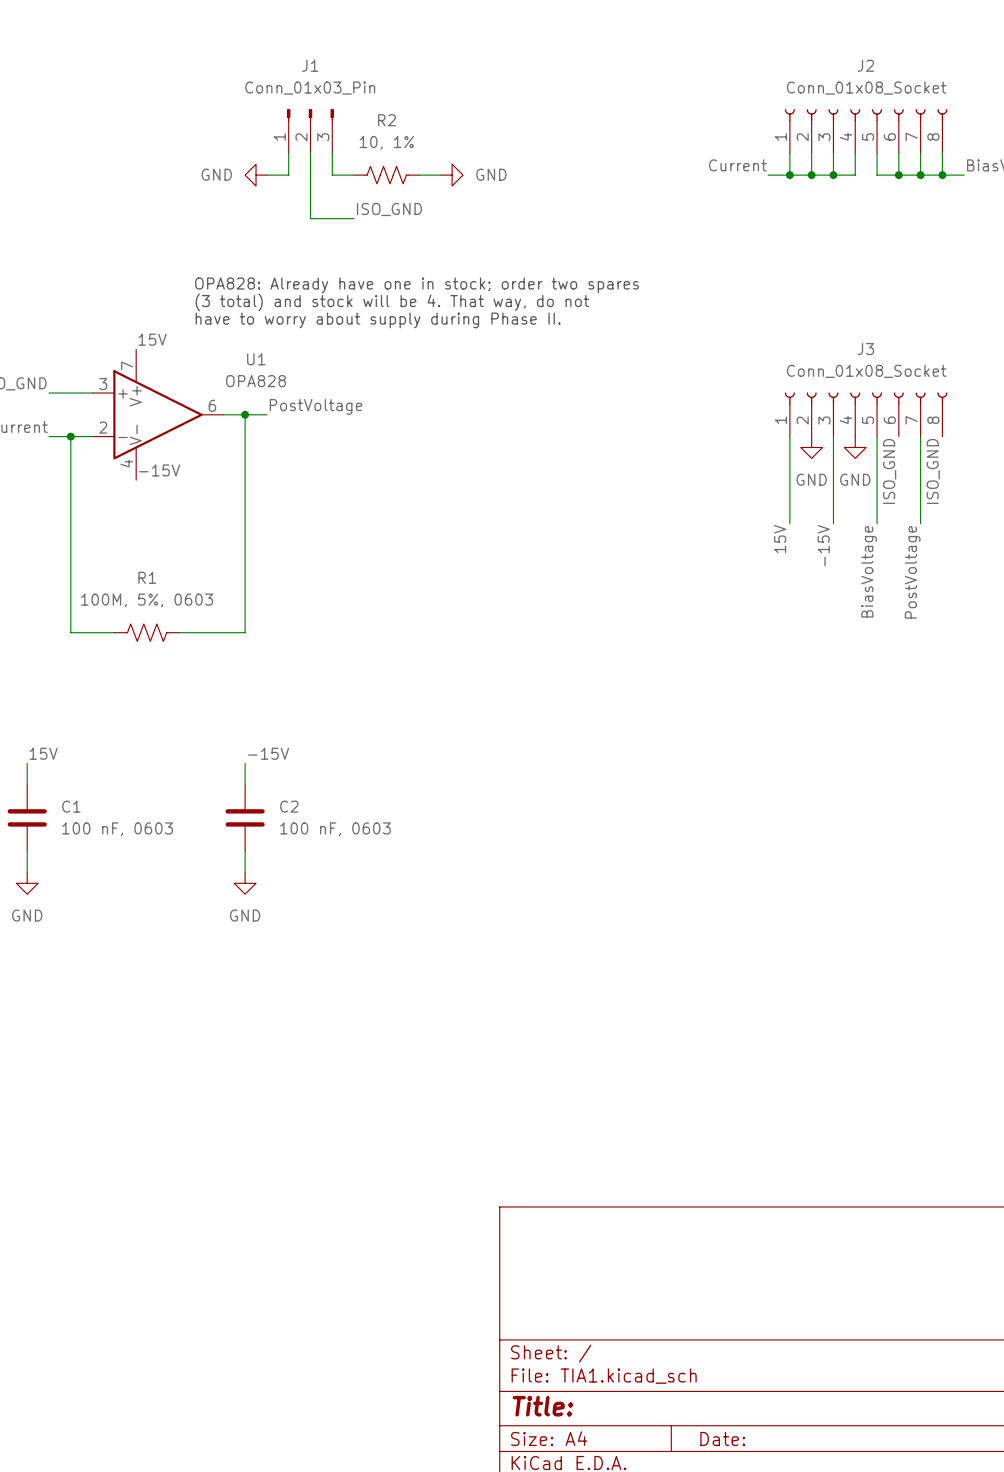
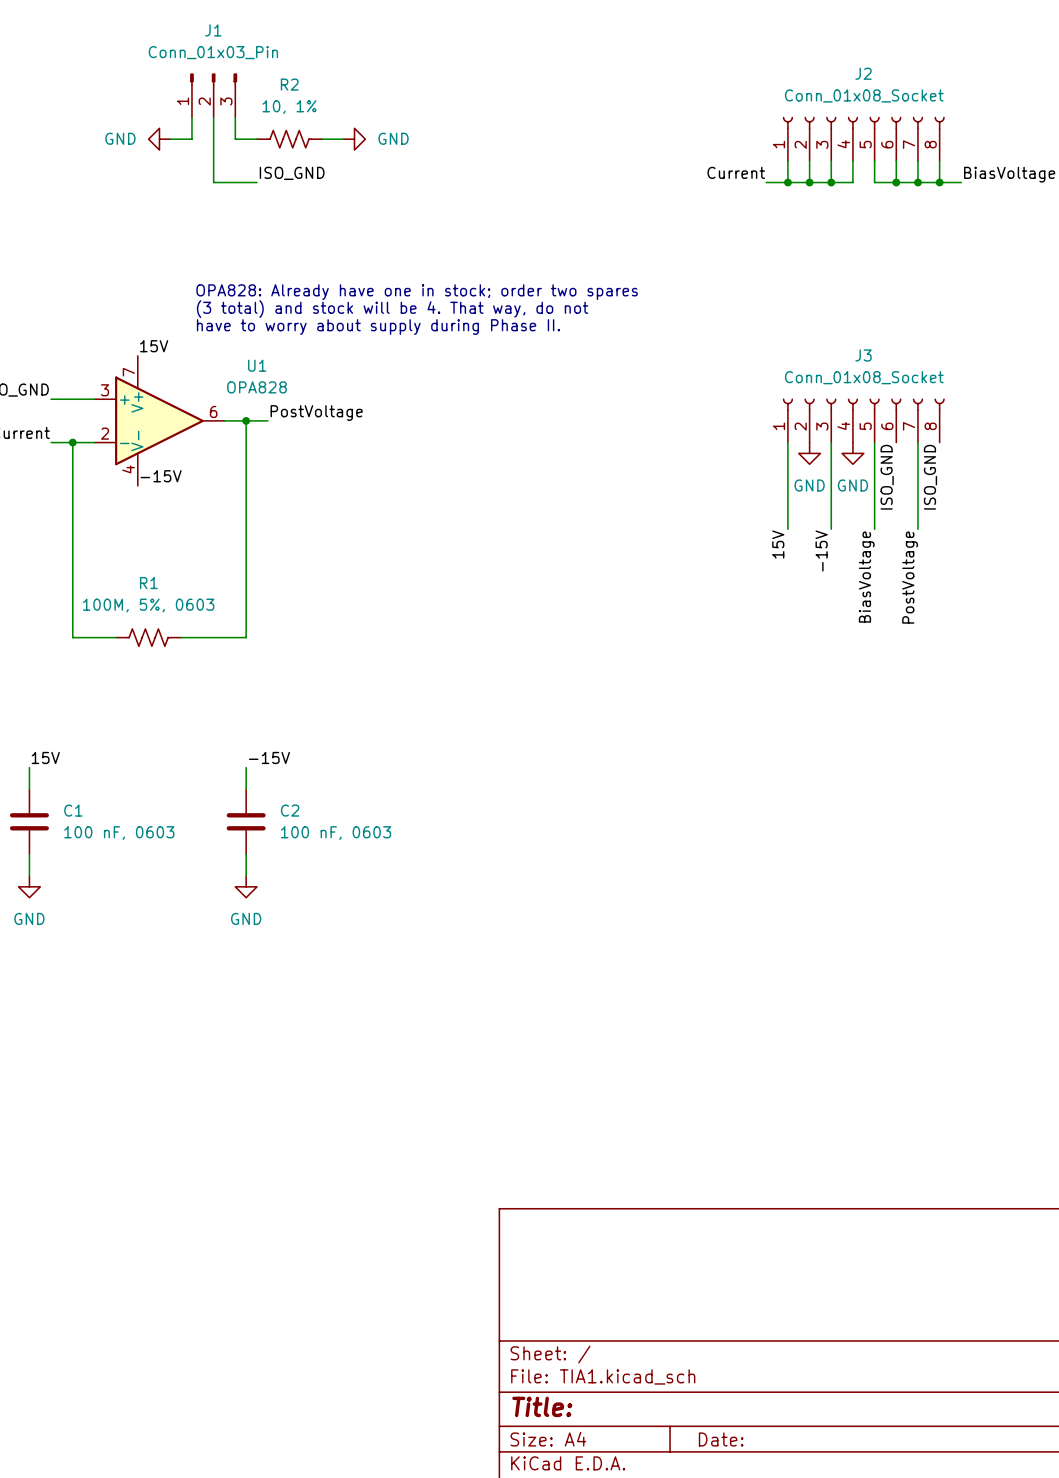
power symbol: none -> GND (159, 139)
J1 position: (310, 131) -> (213, 95)
power symbol: none -> GND (354, 139)
wire: (288, 153) (288, 175) (266, 175) -> (191, 117) (191, 139) (170, 139)
wire: (310, 153) (310, 218) (354, 218) -> (213, 117) (213, 182) (256, 182)
wire: (332, 153) (332, 175) (354, 175) -> (235, 117) (235, 139) (256, 139)
power symbol: GND (256, 175) -> none
R2 position: (386, 175) -> (289, 139)
wire: (419, 175) (441, 175) -> (322, 139) (343, 139)
power symbol: GND (452, 175) -> none
label position: ISO_GND (389, 209) -> ISO_GND (292, 173)

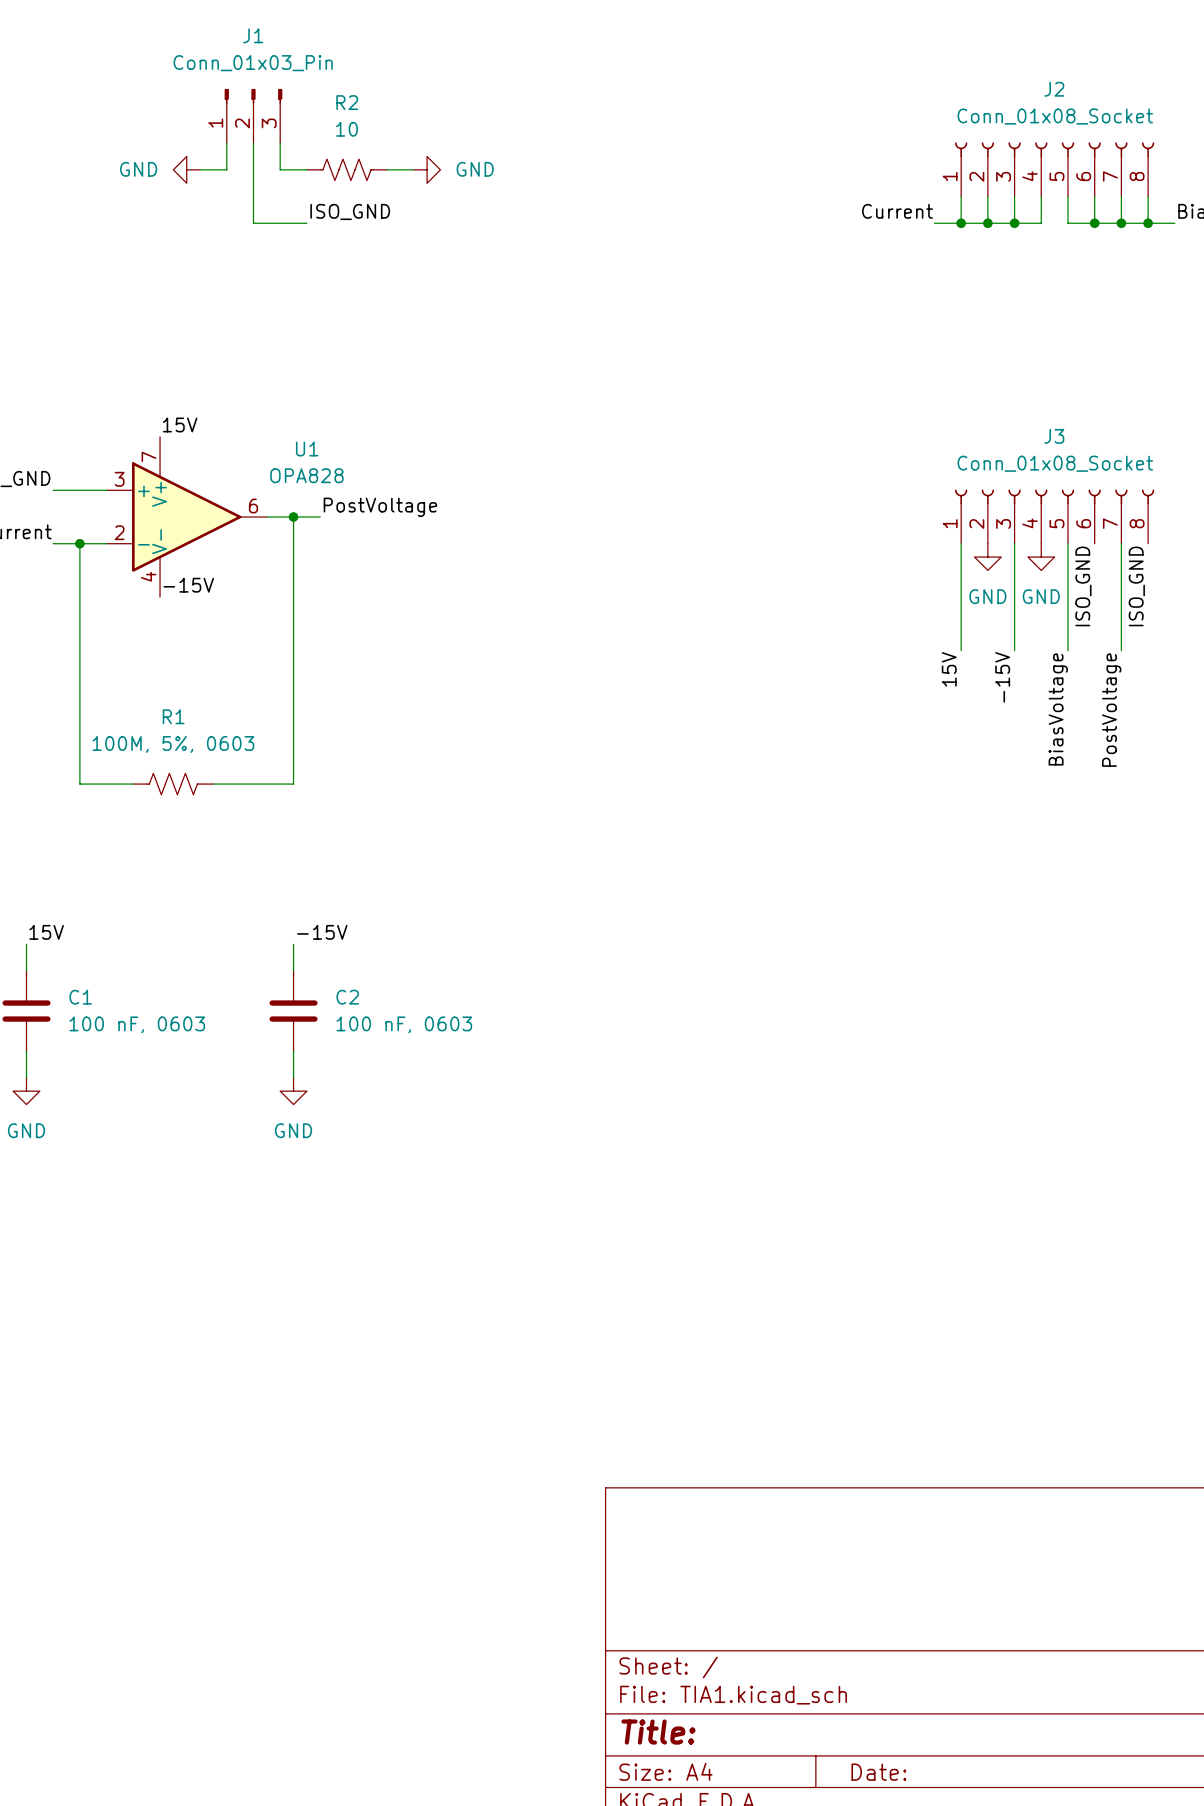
R2 value: 10, 1% (289, 107) -> 10 (346, 129)
text: OPA828: Already have one in stock; order two spares (417, 292) -> none
text: (3 total) and stock will be 4. That way, do not (392, 309) -> none
text: have to worry about supply during Phase II. (378, 327) -> none

